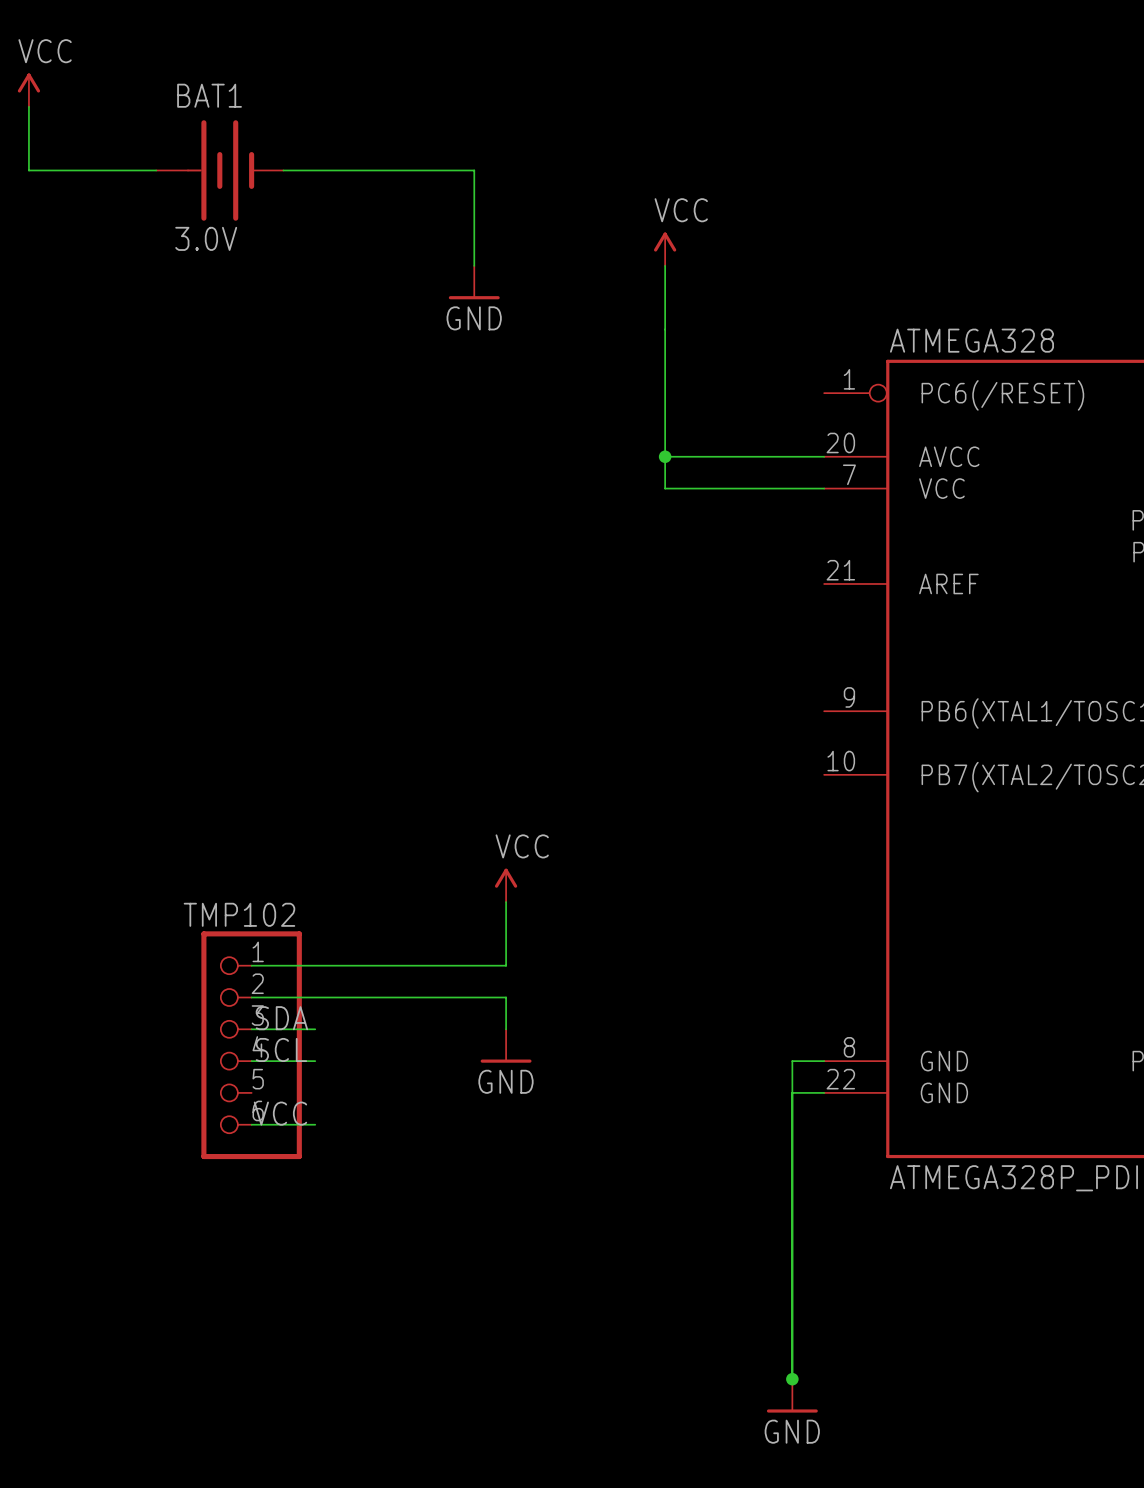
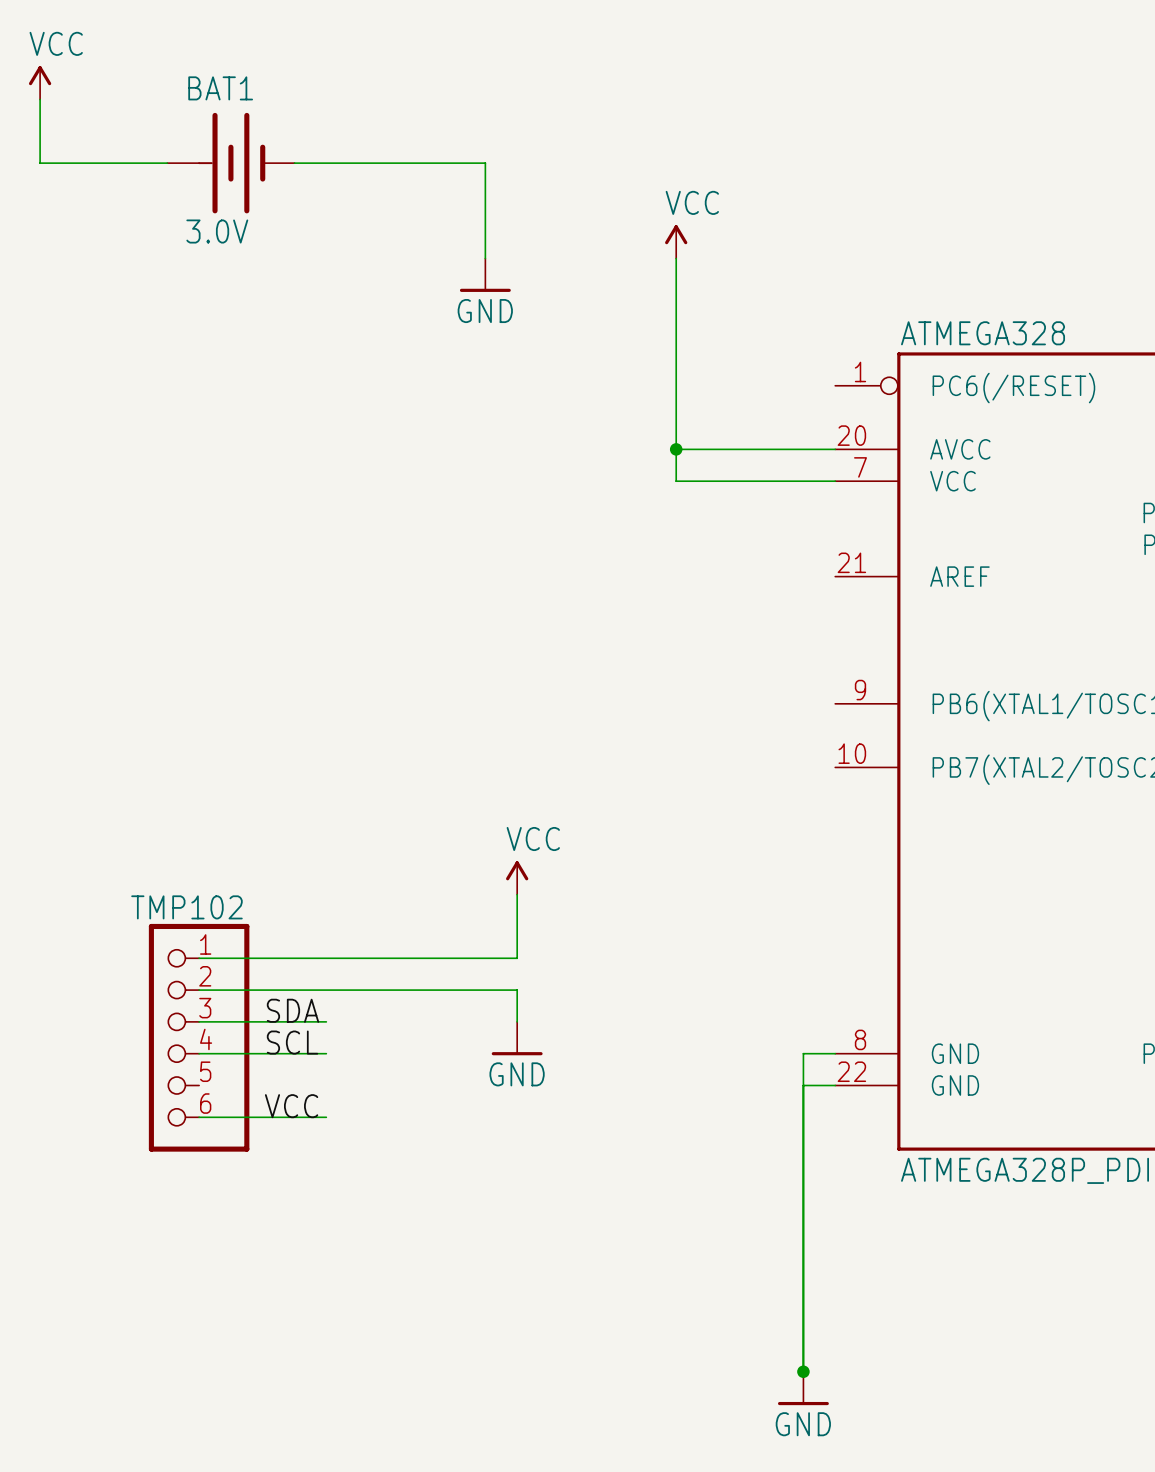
wire: none -> (199, 958) (262, 958)
wire: none -> (199, 990) (262, 990)
wire: none -> (199, 1021) (262, 1021)
TMP102 position: (251, 1045) -> (199, 1037)
wire: none -> (199, 1053) (262, 1053)
wire: none -> (199, 1117) (262, 1117)

